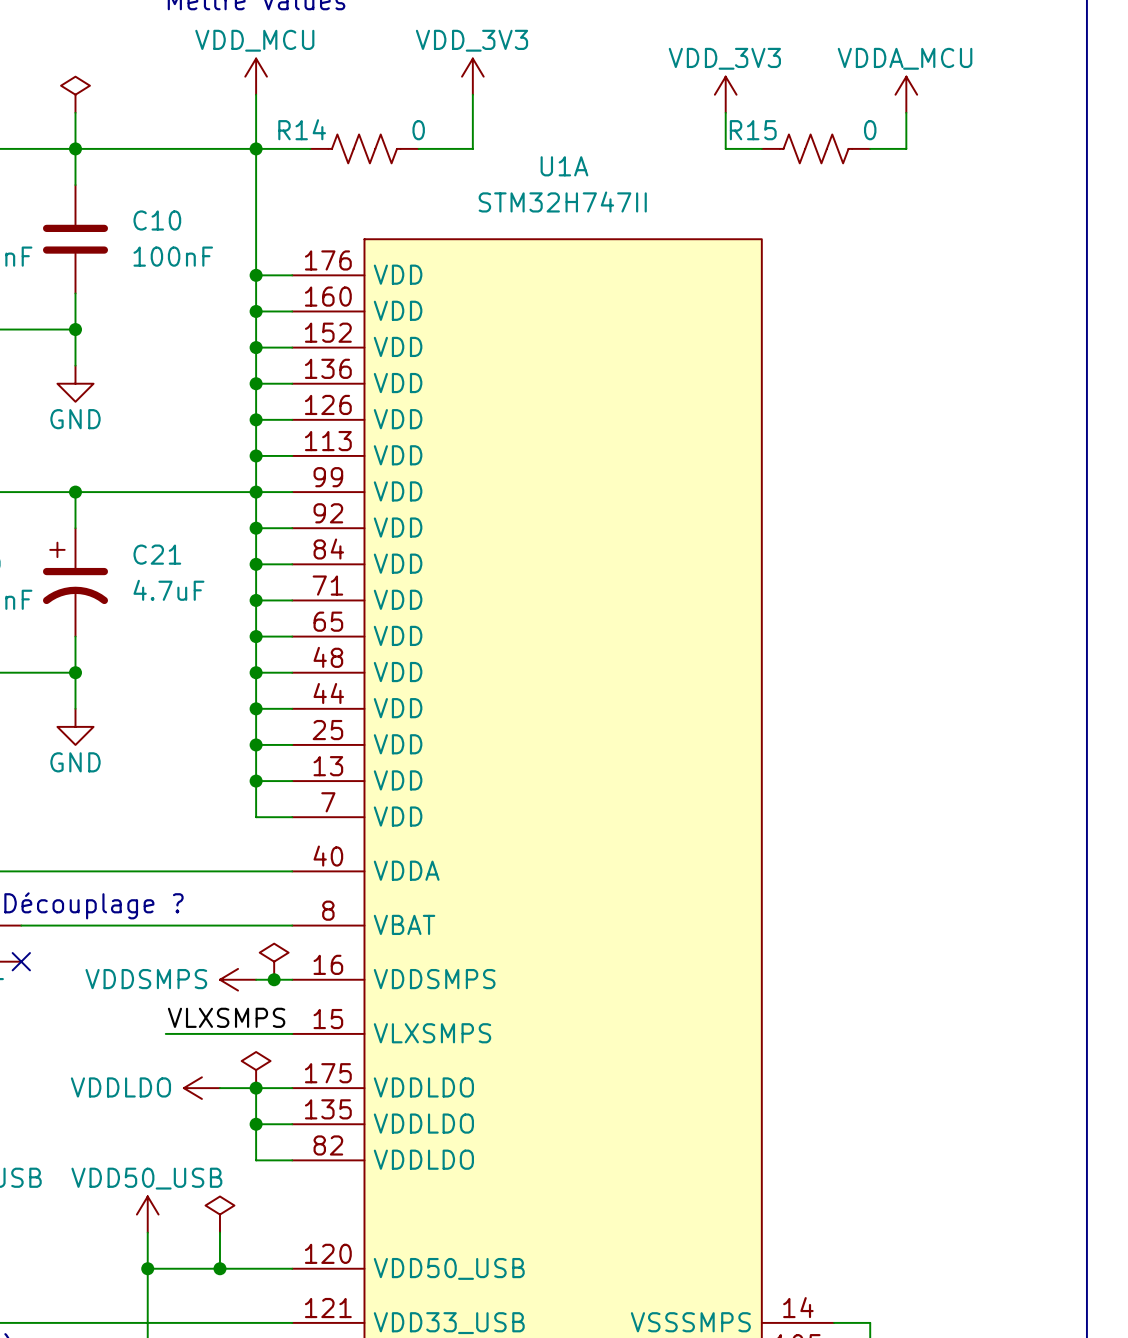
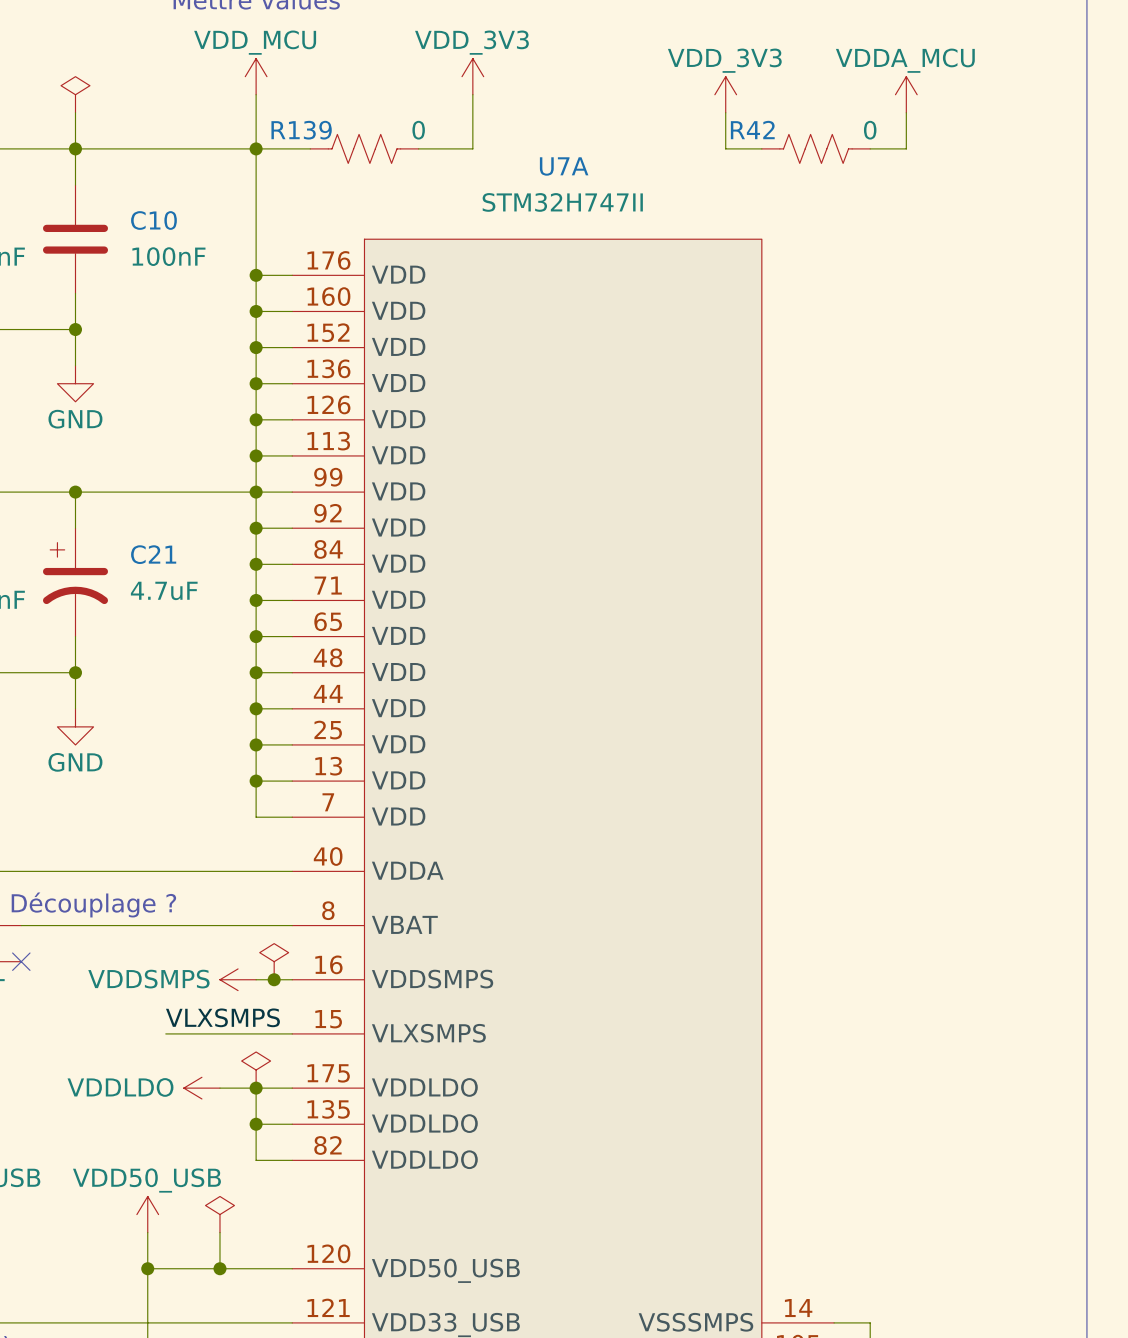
R14 name: R14 (302, 129) -> R139 (301, 130)
R15 name: R15 (753, 130) -> R42 (752, 130)
U1A name: U1A (564, 166) -> U7A (564, 166)

